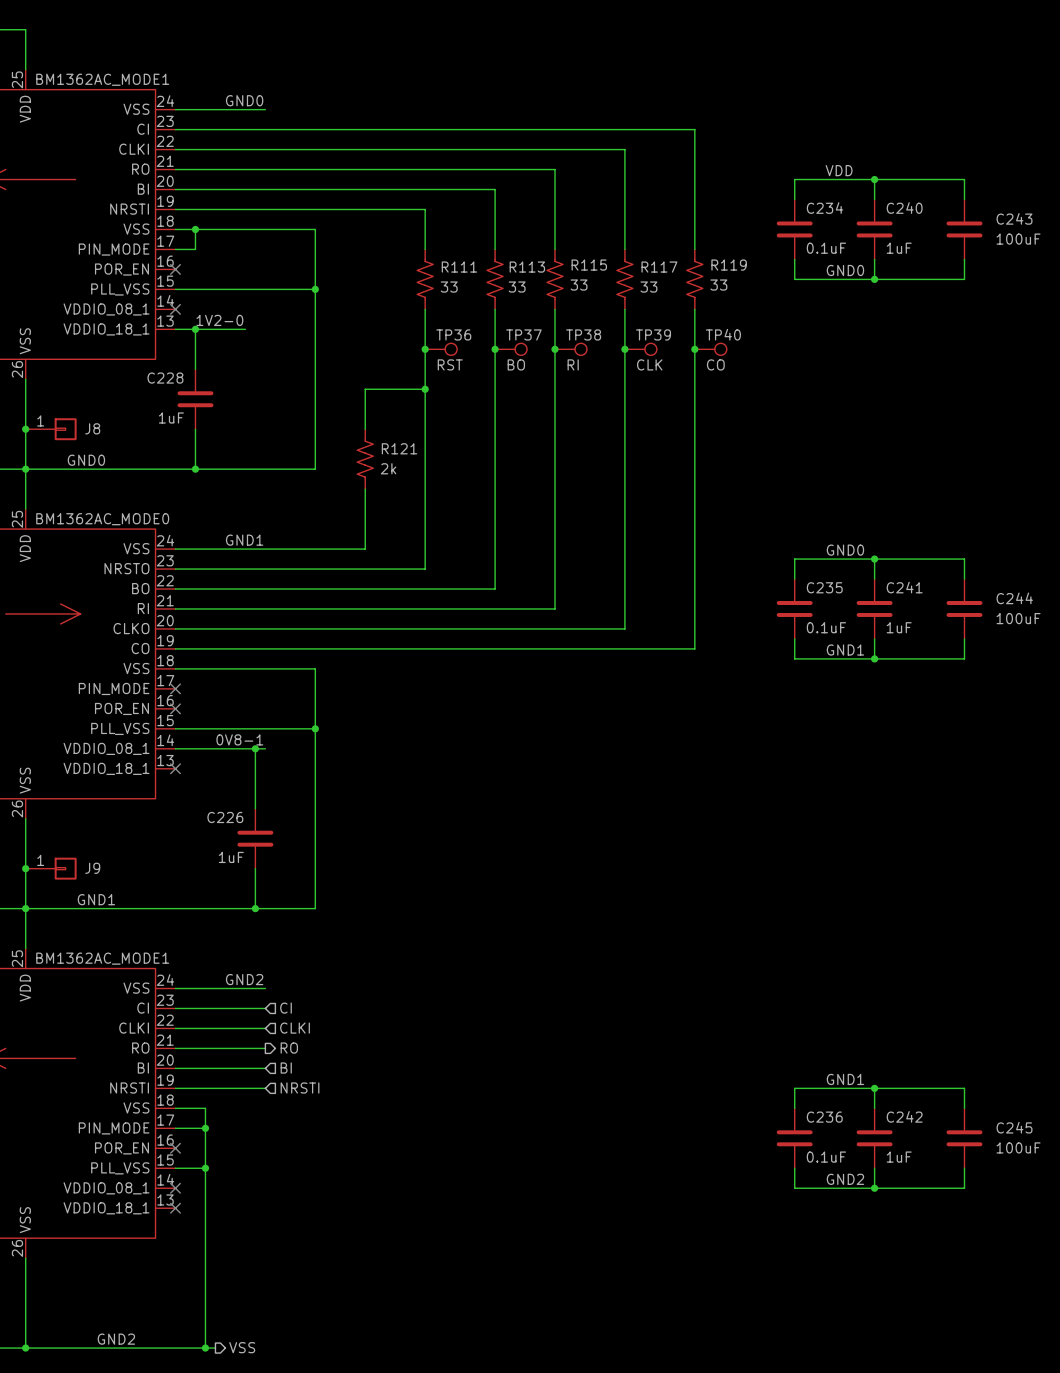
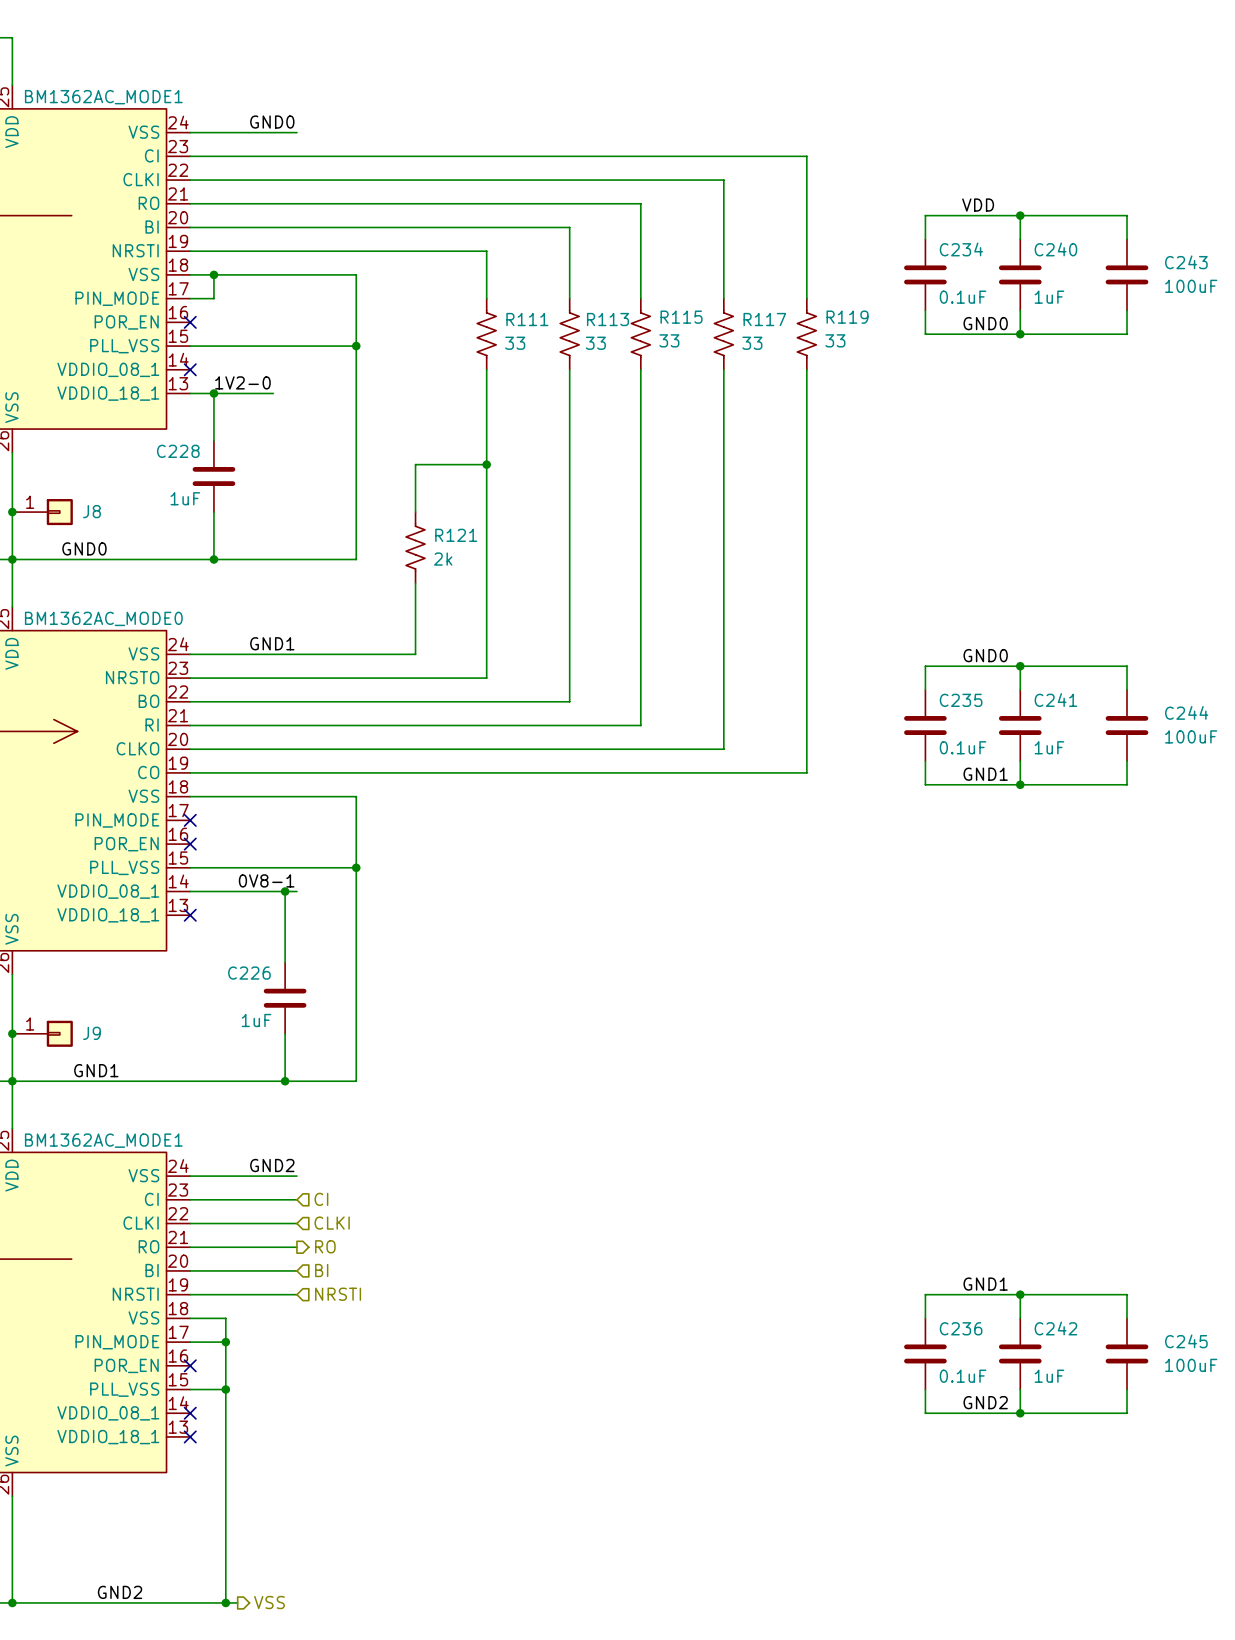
junction: (425, 349) -> none
TP36: RST (441, 349) -> none
junction: (495, 349) -> none
TP37: BO (511, 349) -> none
junction: (555, 349) -> none
TP38: RI (570, 349) -> none
junction: (624, 349) -> none
TP39: CLK (640, 349) -> none
junction: (694, 349) -> none
TP40: CO (710, 349) -> none

